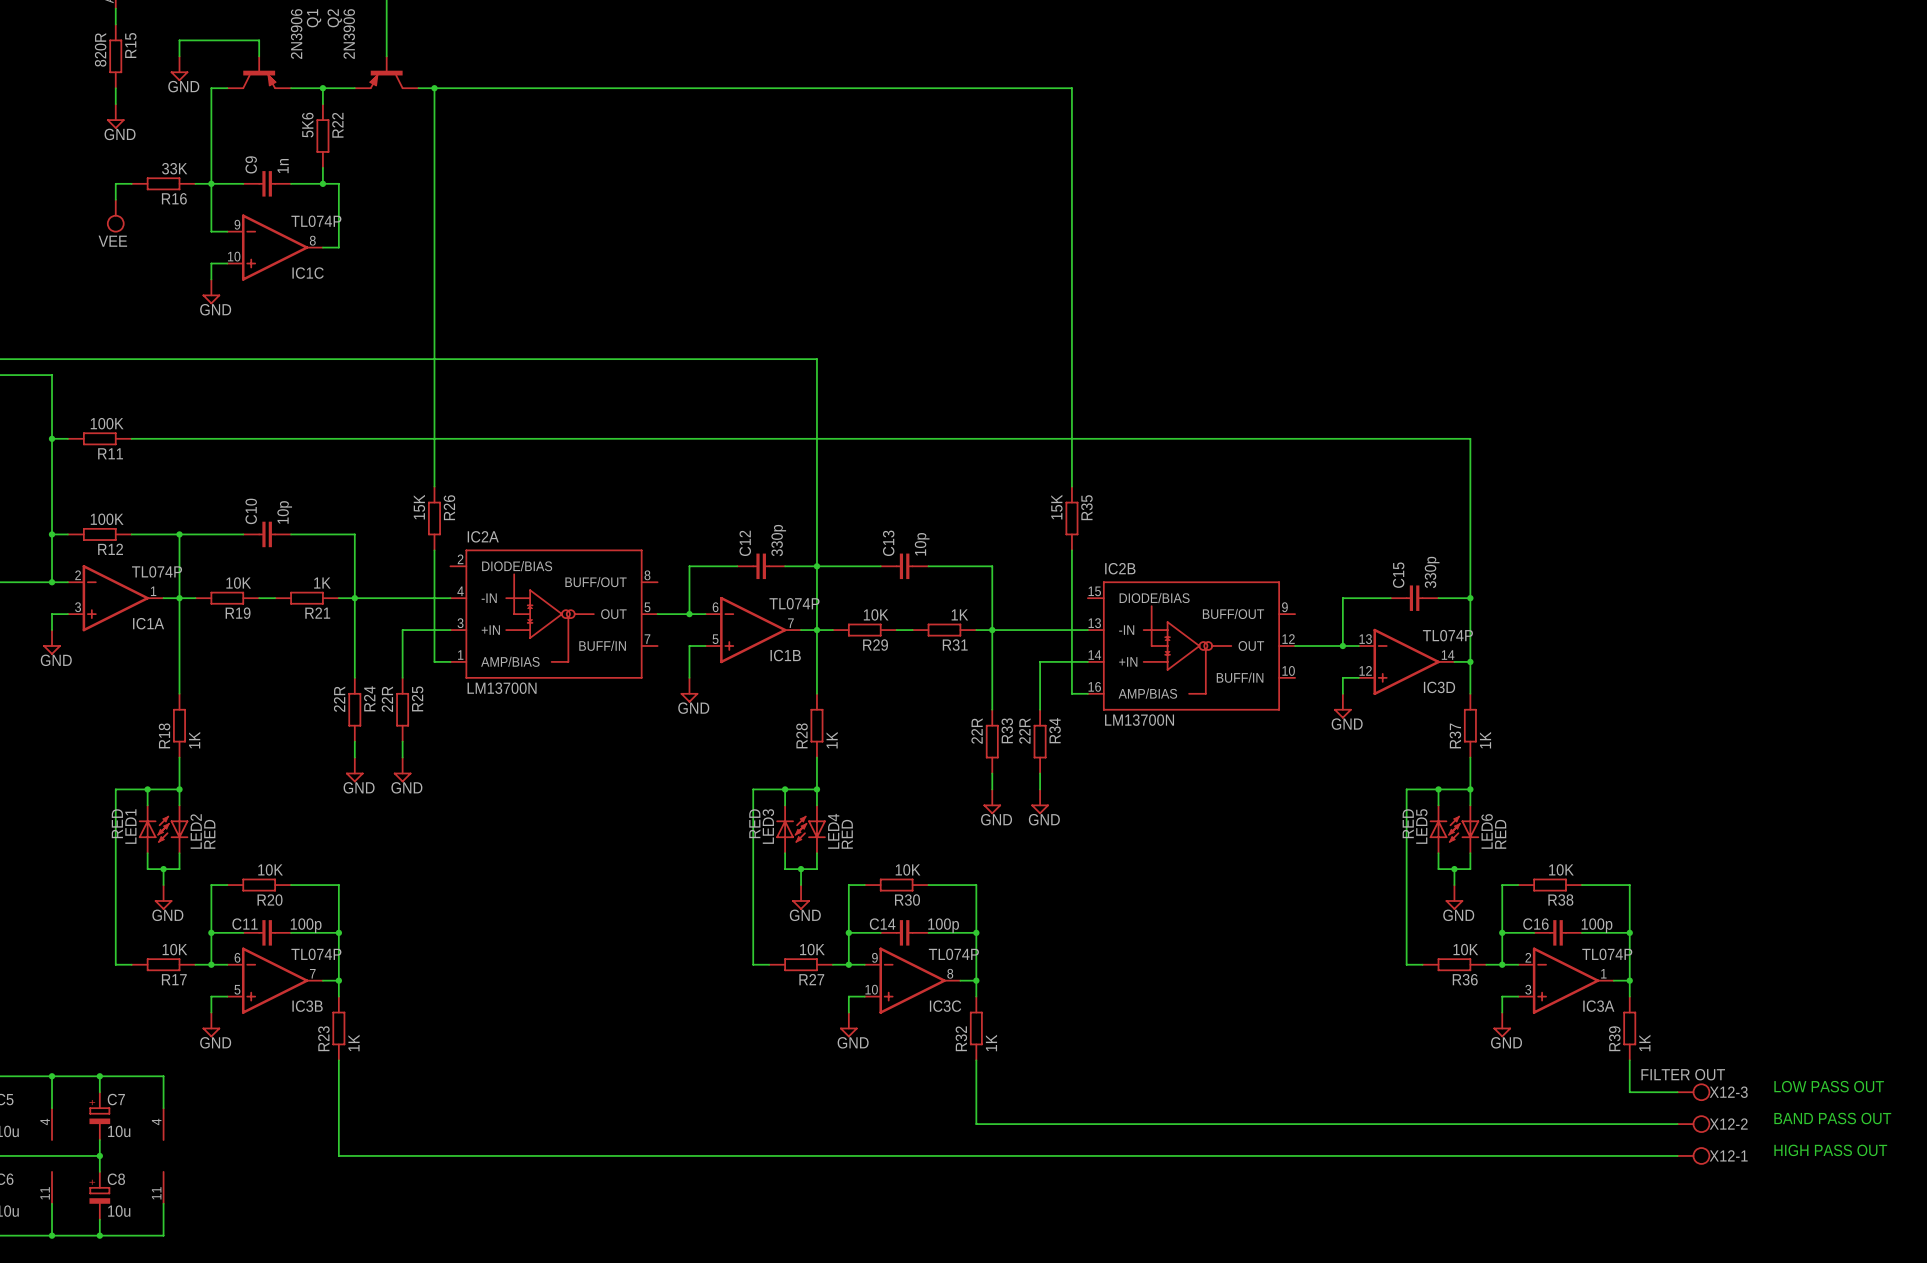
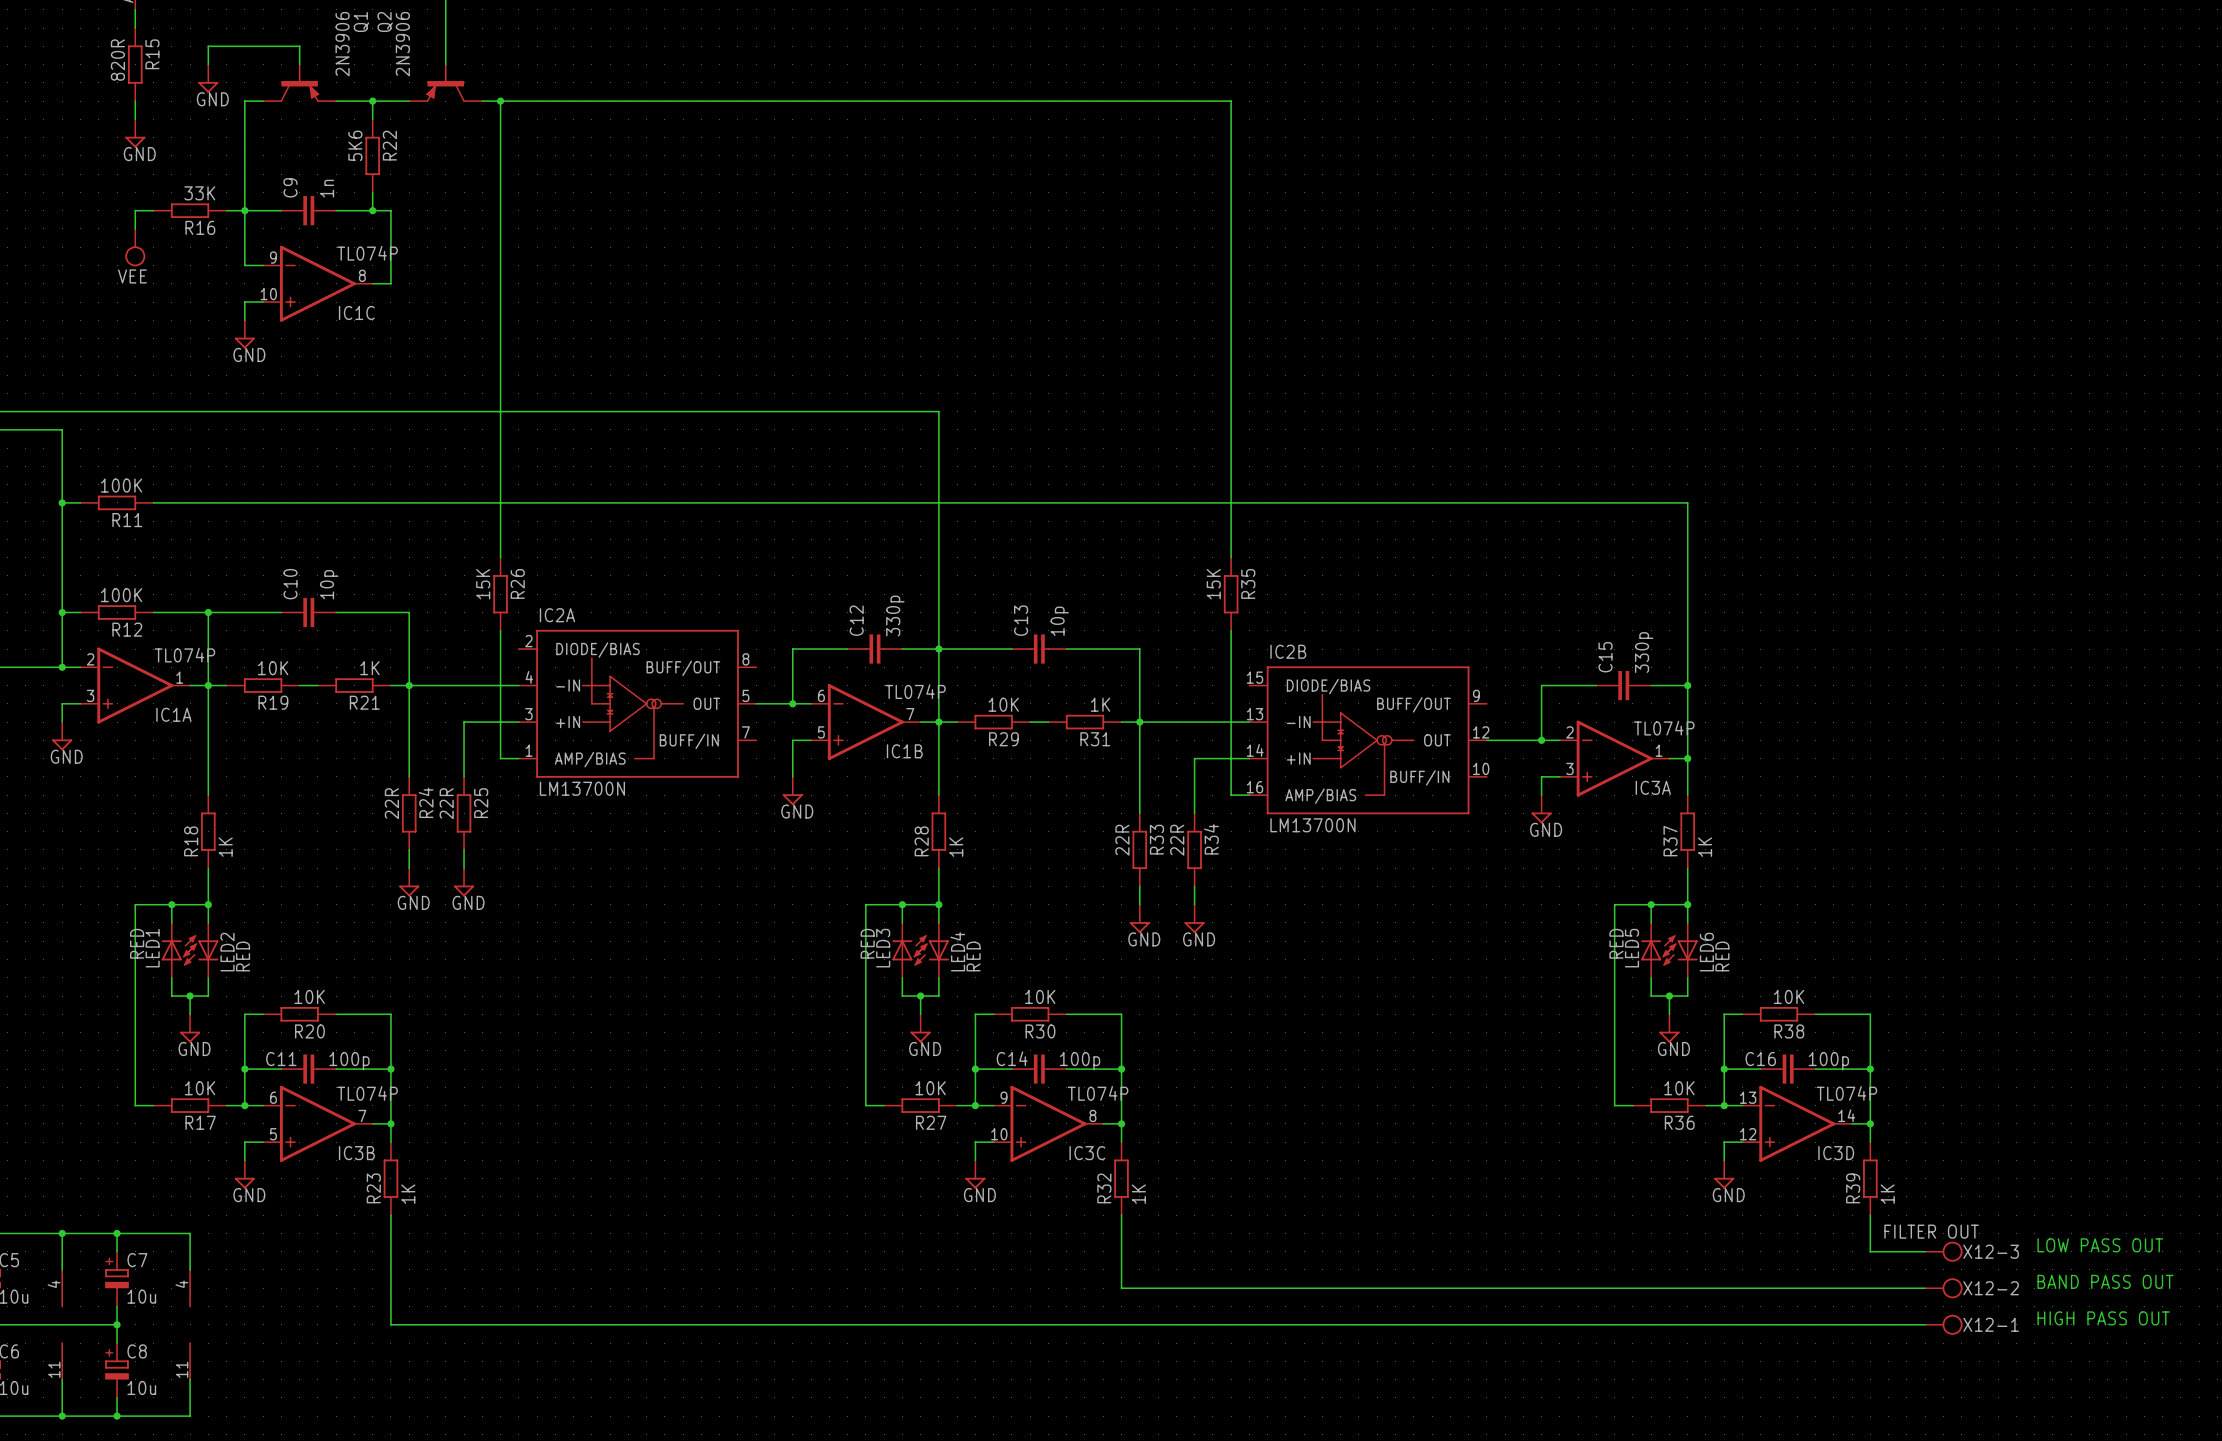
IC3D position: (1406, 661) -> (1797, 1123)
IC3A position: (1565, 980) -> (1614, 758)

